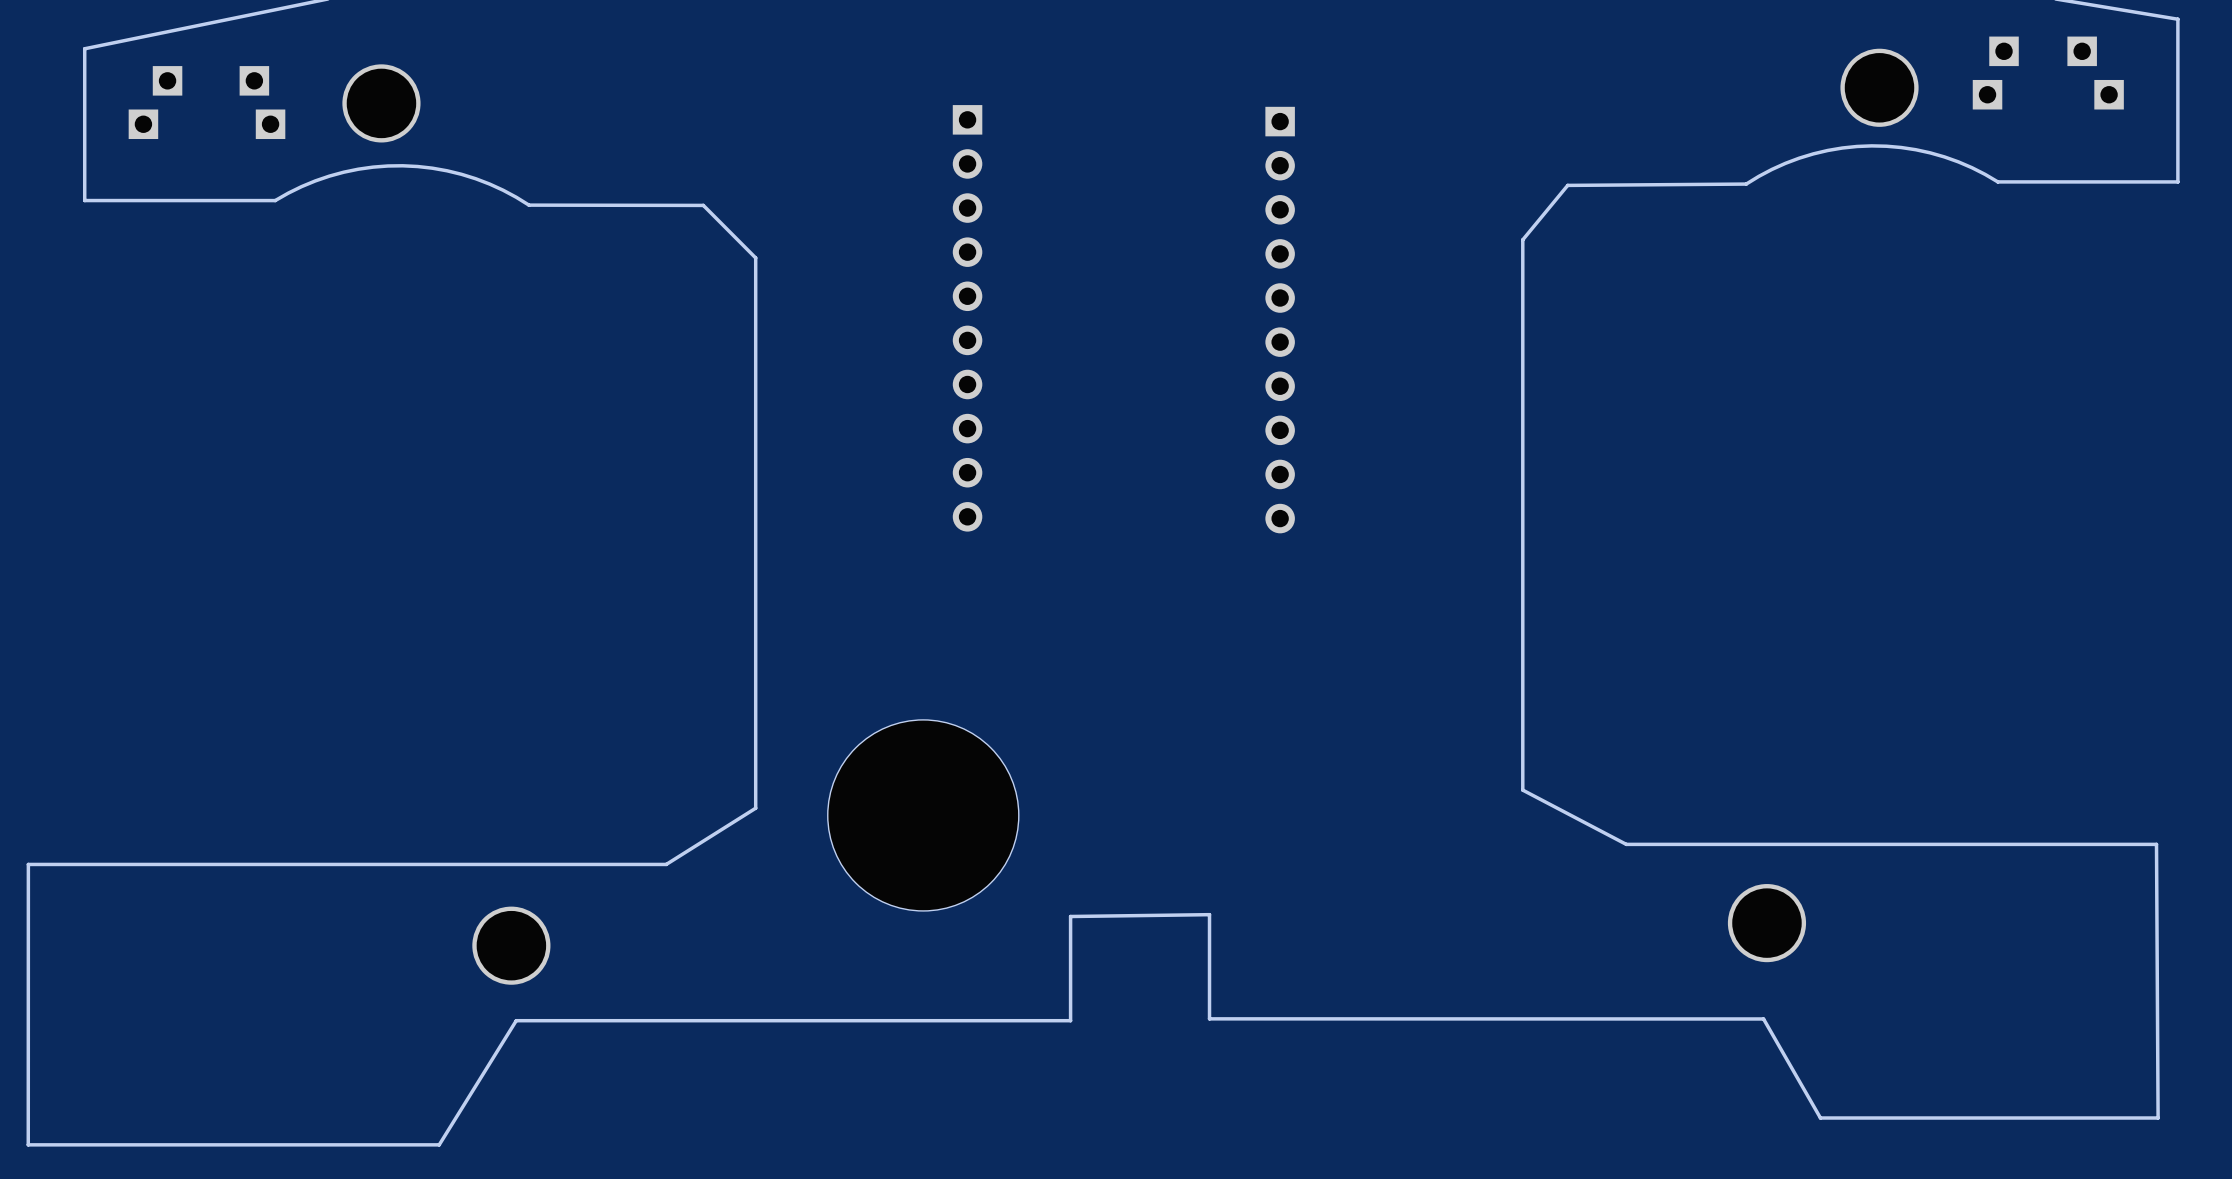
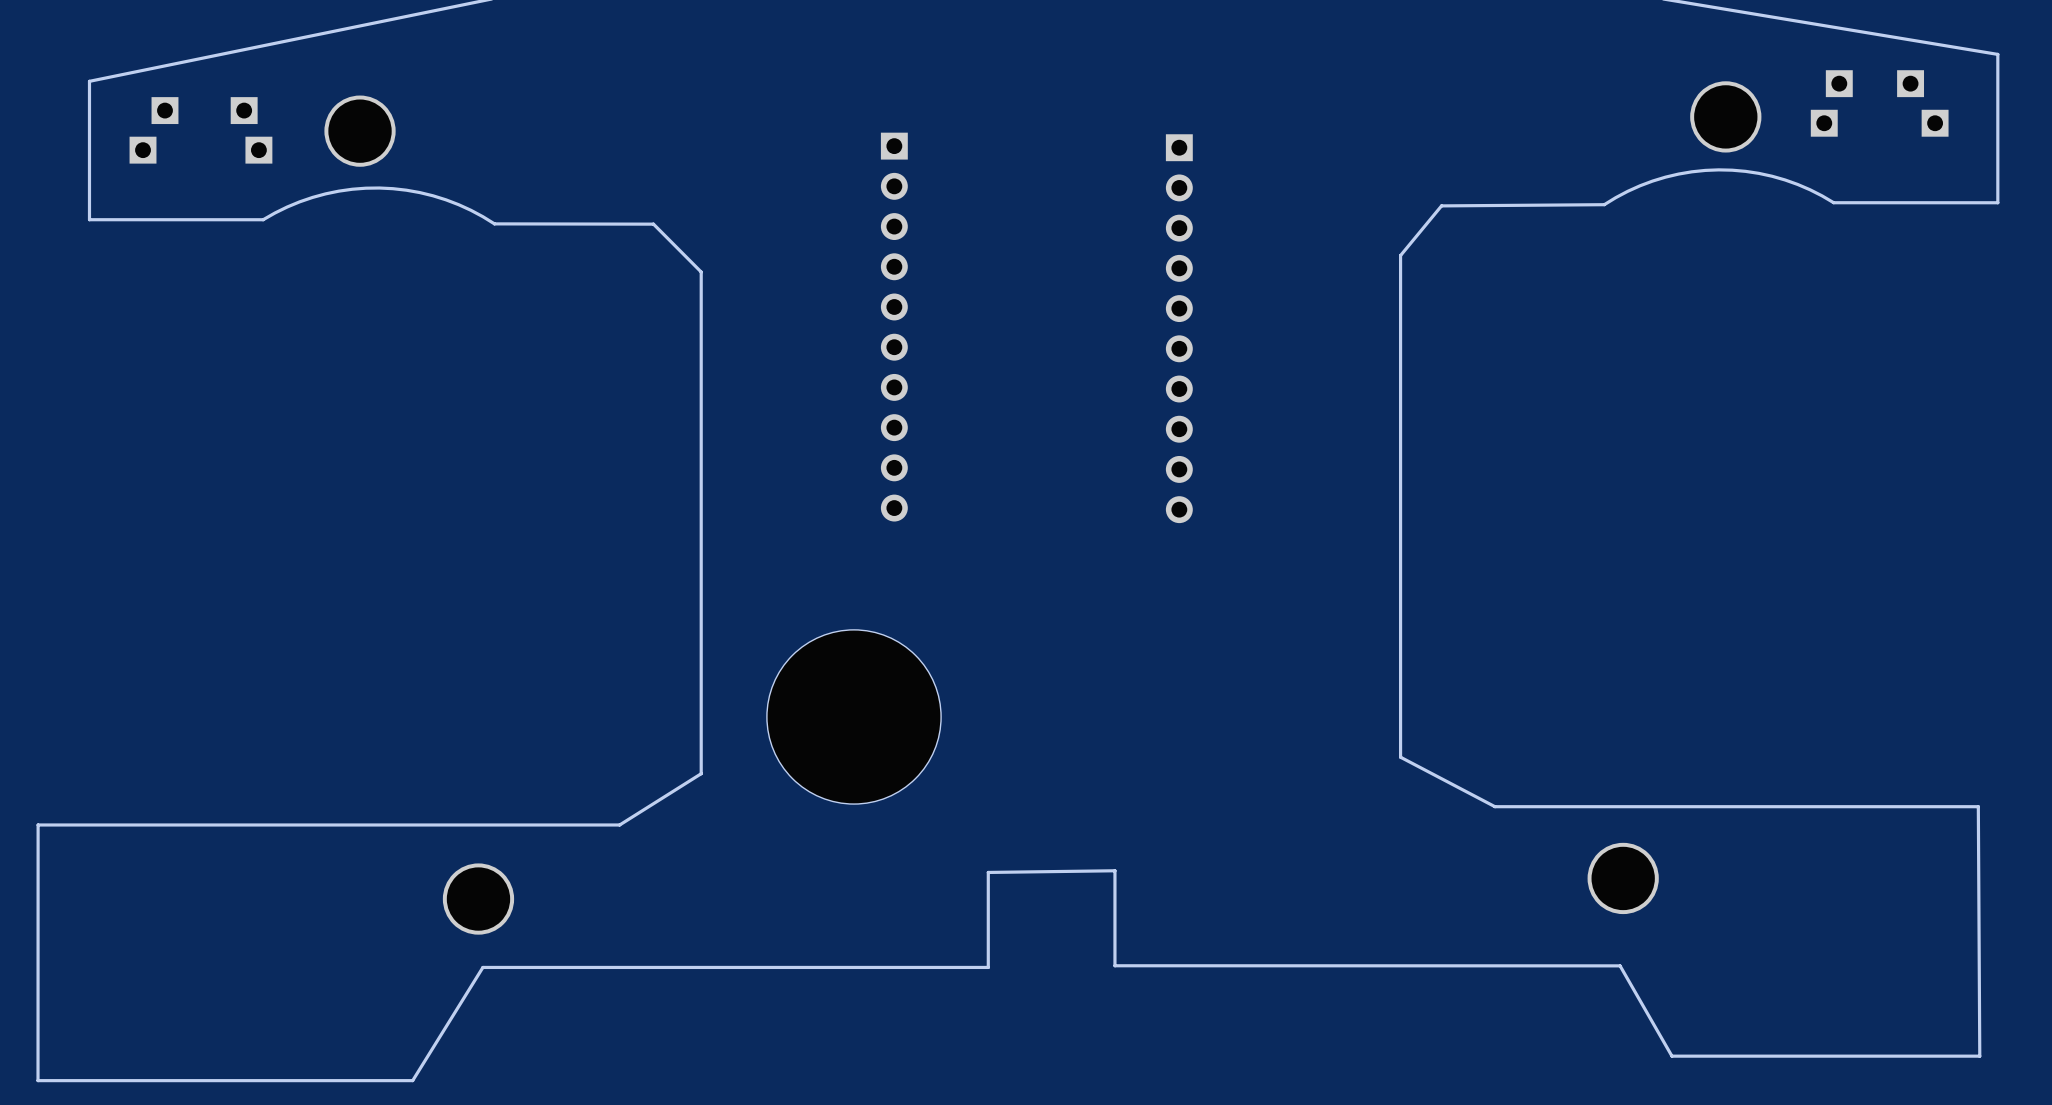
part position: (923, 815) -> (854, 716)

